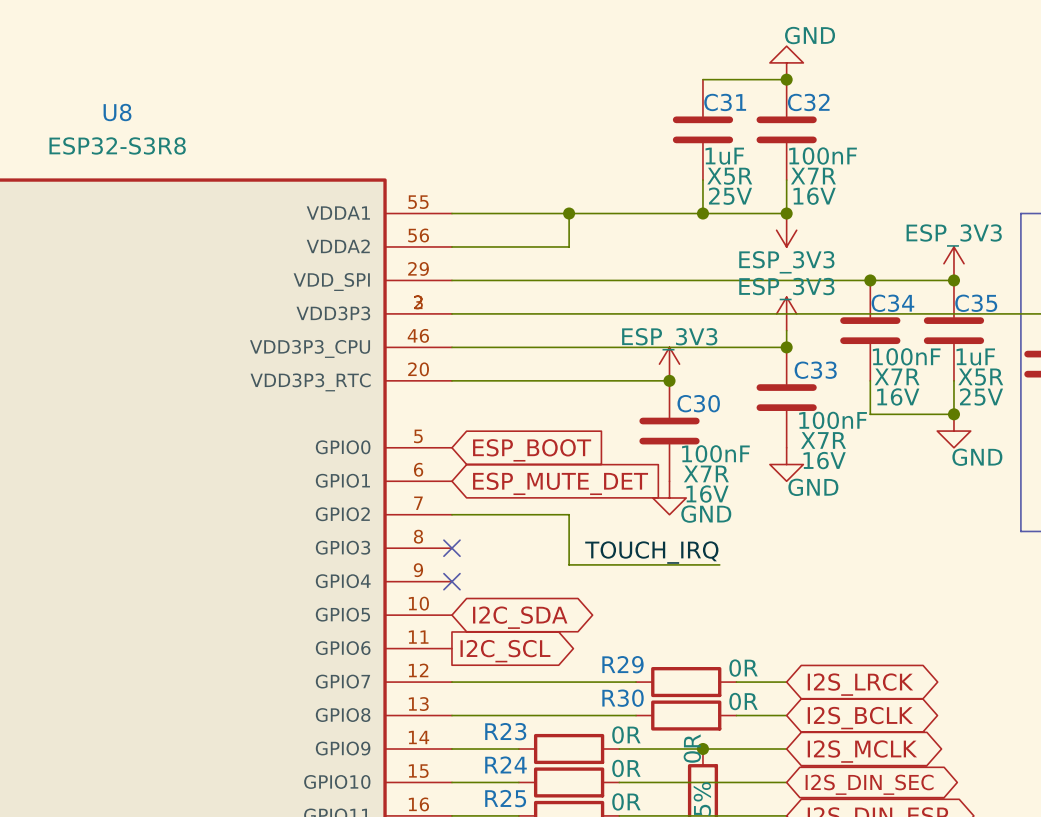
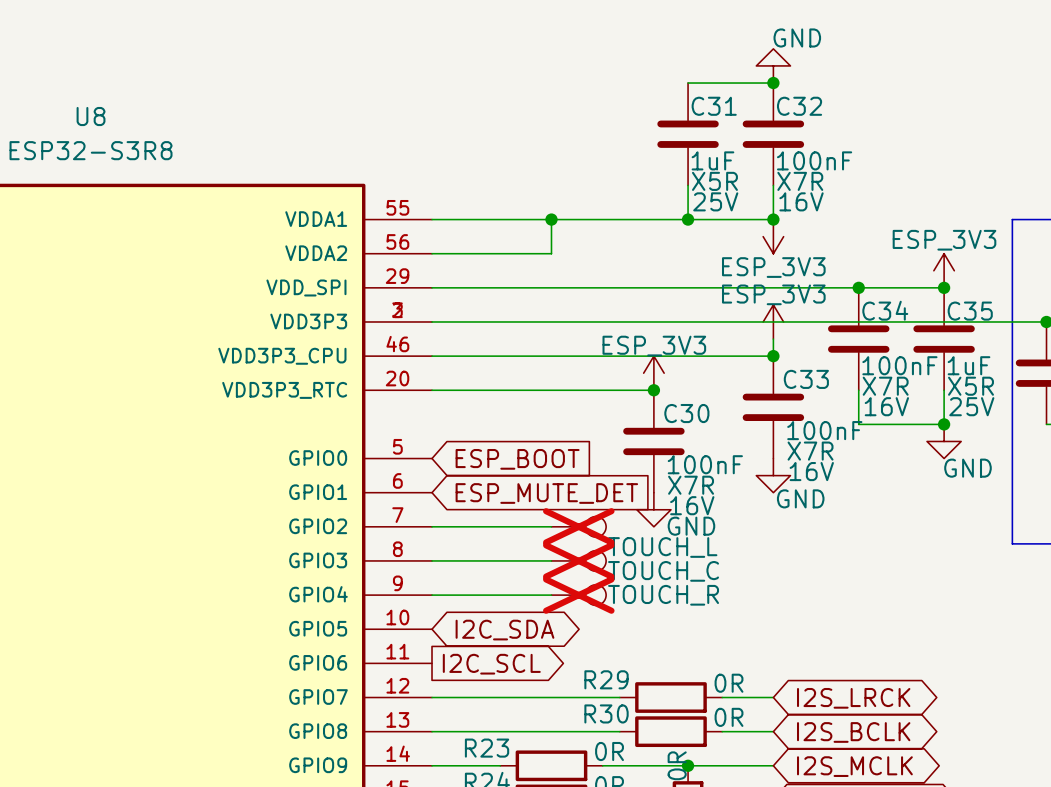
wire: (569, 514) (569, 564) (719, 564) -> none
part: none -> TOUCH_L (578, 526)
wire: none -> (432, 560) (551, 560)
no-connect mark: (451, 548) -> none
part: none -> TOUCH_C (578, 560)
label: TOUCH_IRQ (651, 552) -> none
wire: none -> (432, 595) (551, 595)
no-connect mark: (451, 581) -> none
part: none -> TOUCH_R (578, 595)

